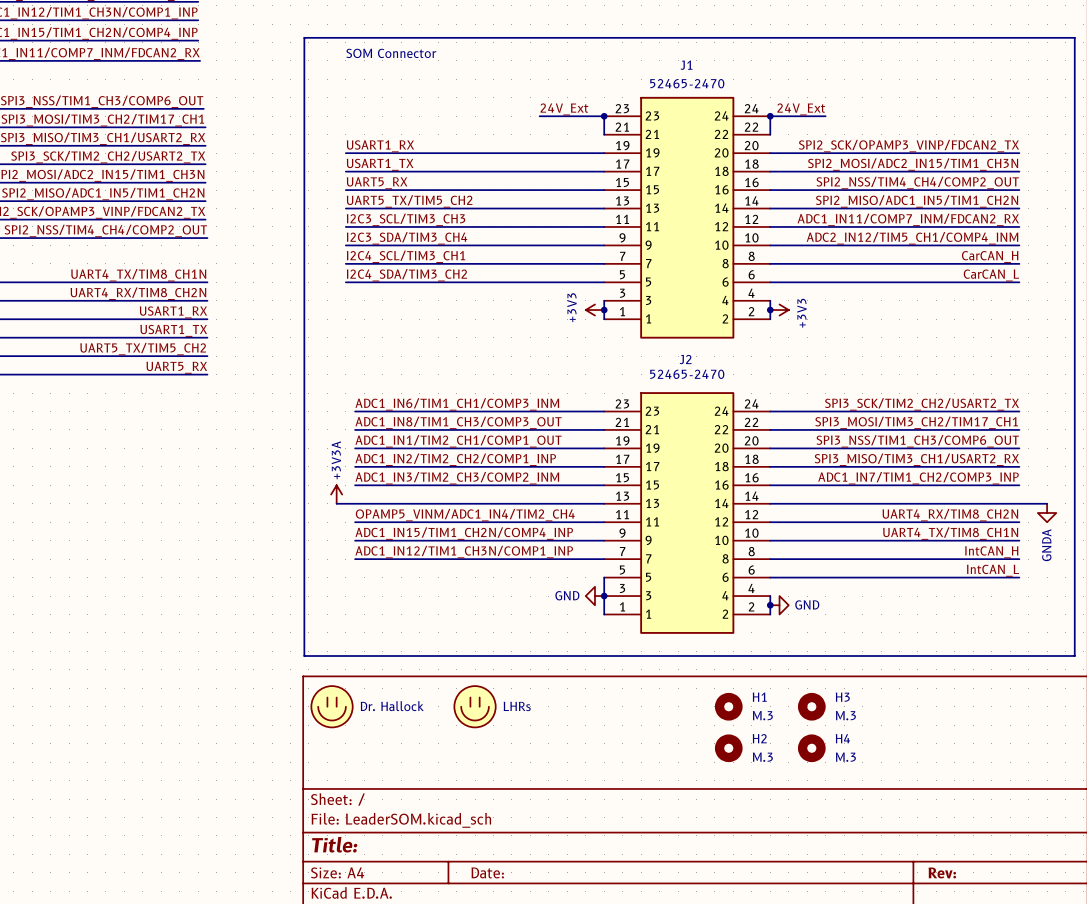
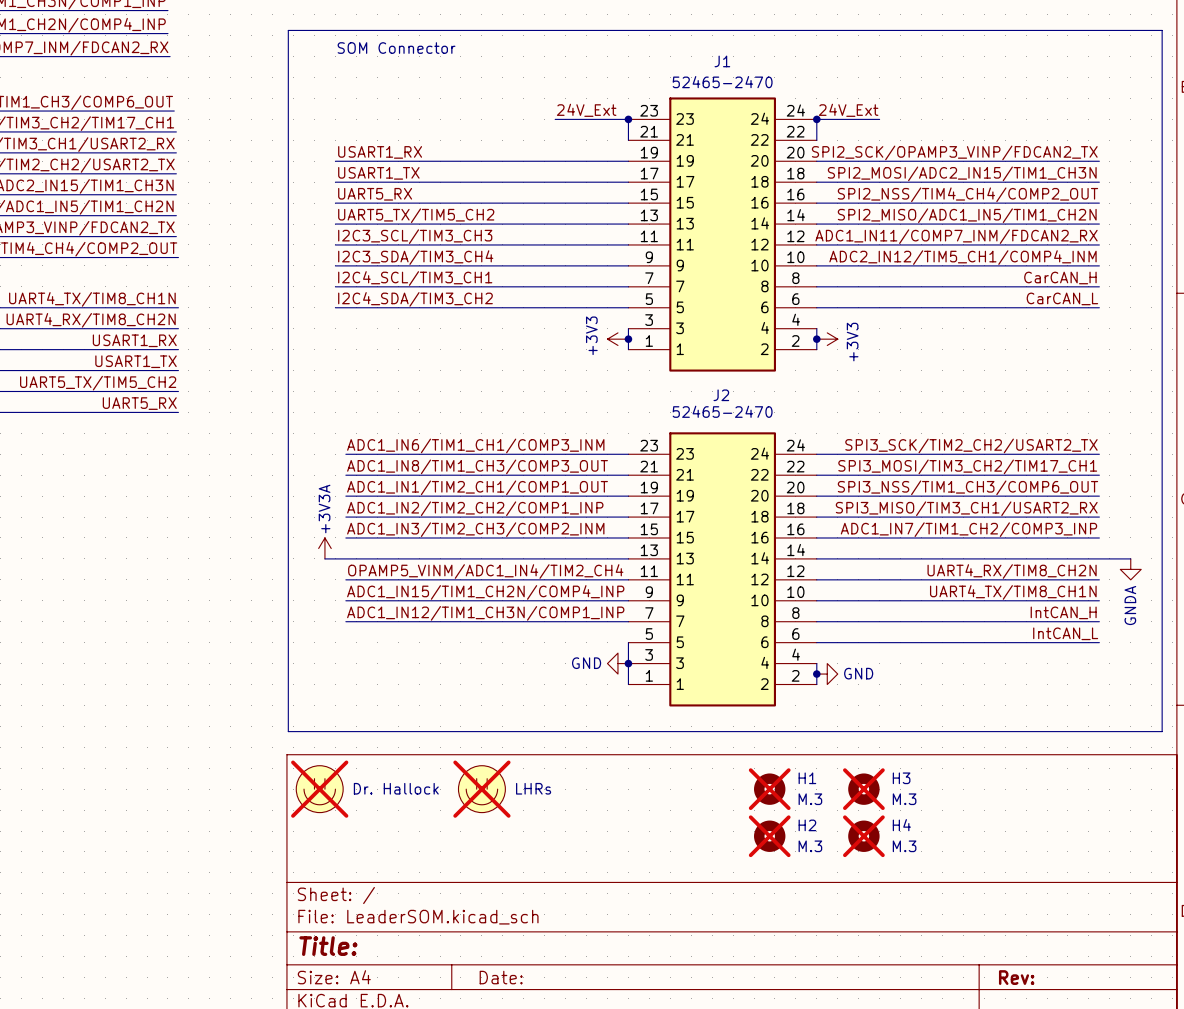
part do-not-place cross: none -> (319, 789)
part do-not-place cross: none -> (481, 789)
H1 do-not-place cross: none -> (769, 789)
H3 do-not-place cross: none -> (863, 789)
H2 do-not-place cross: none -> (769, 836)
H4 do-not-place cross: none -> (863, 836)

